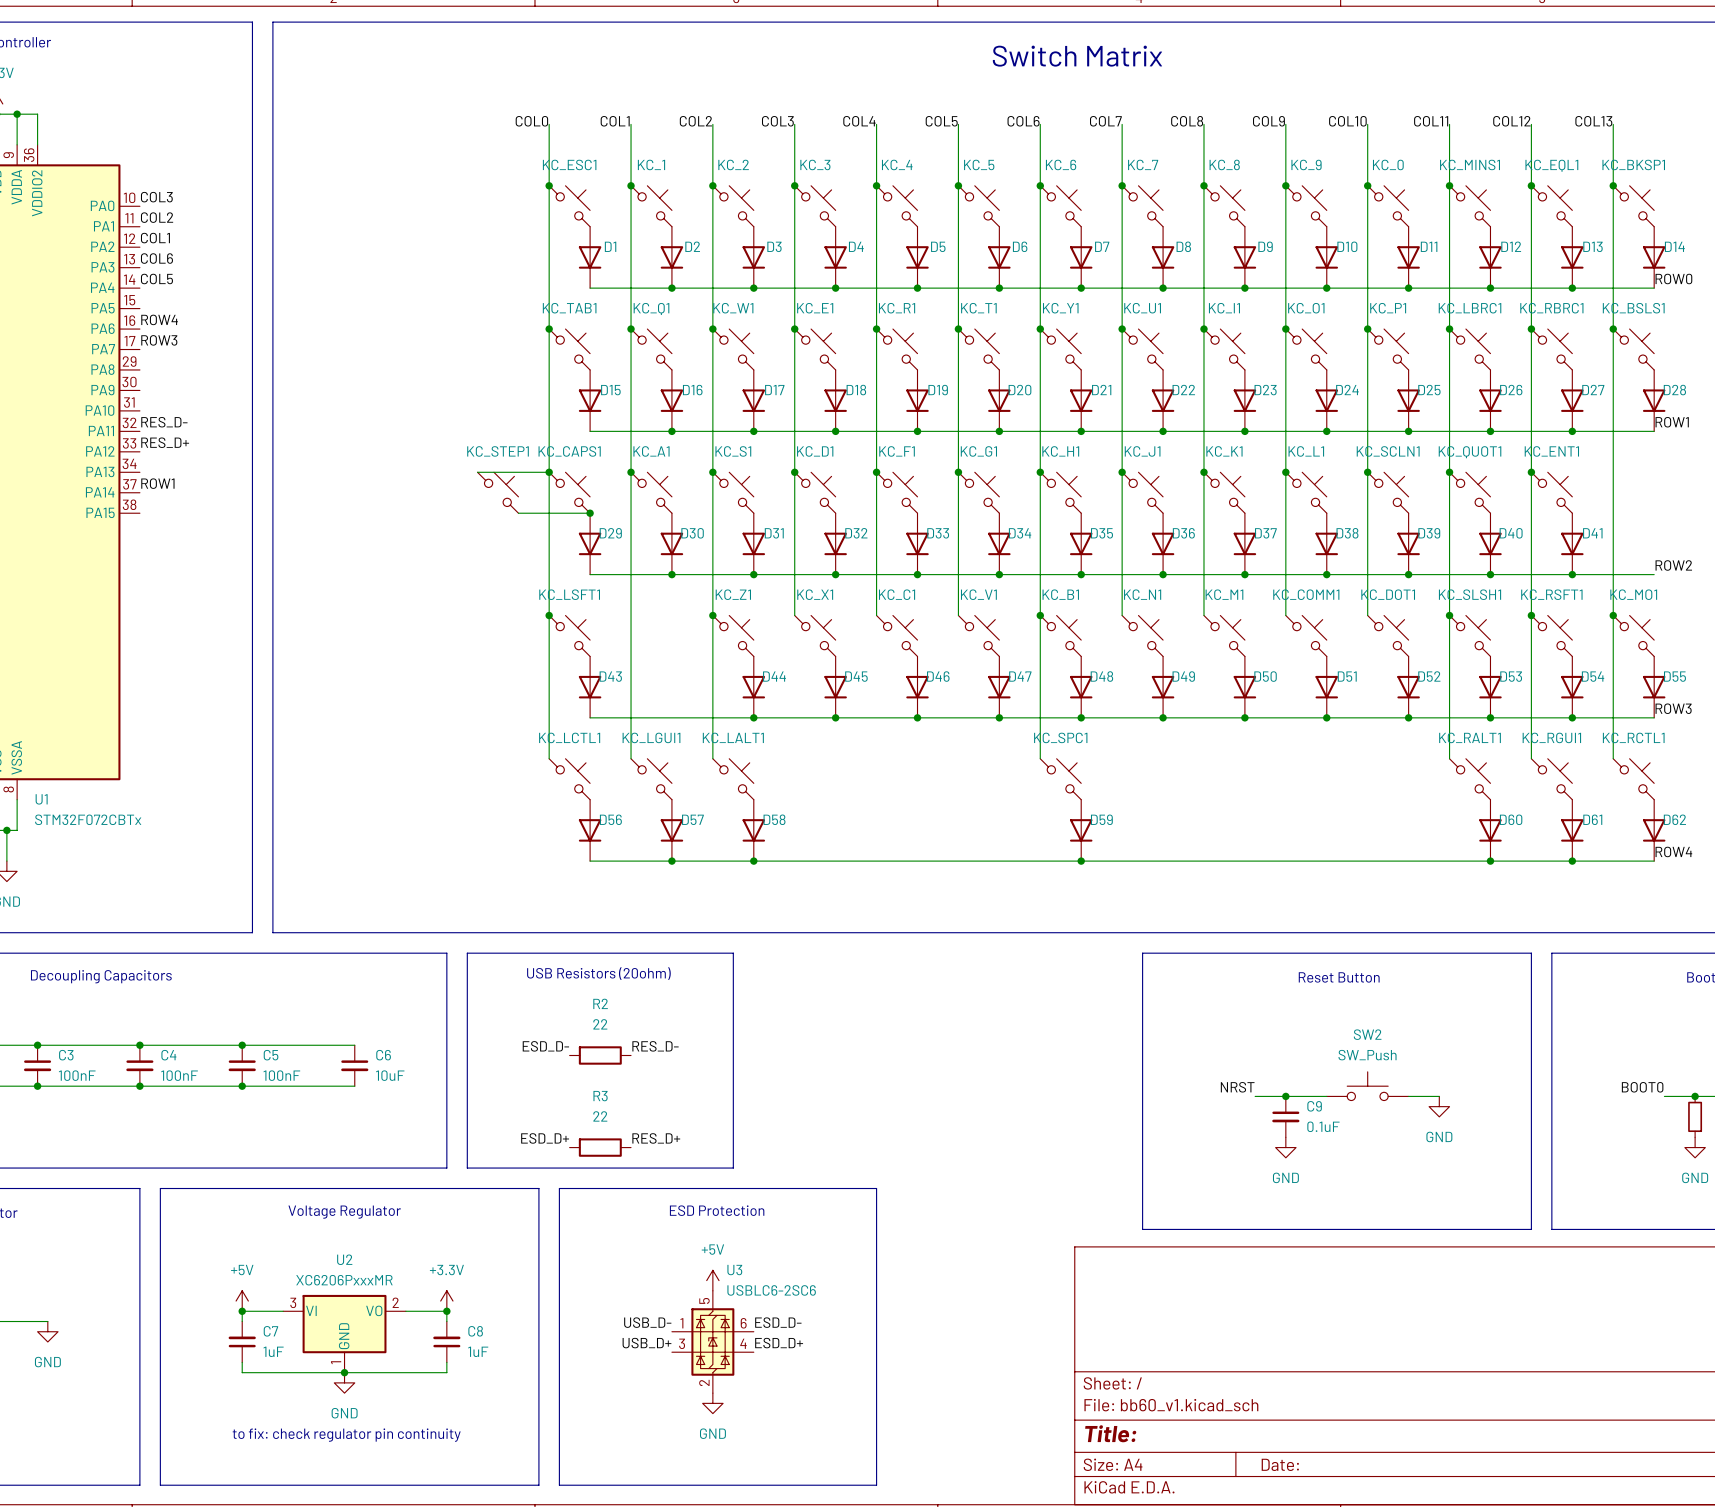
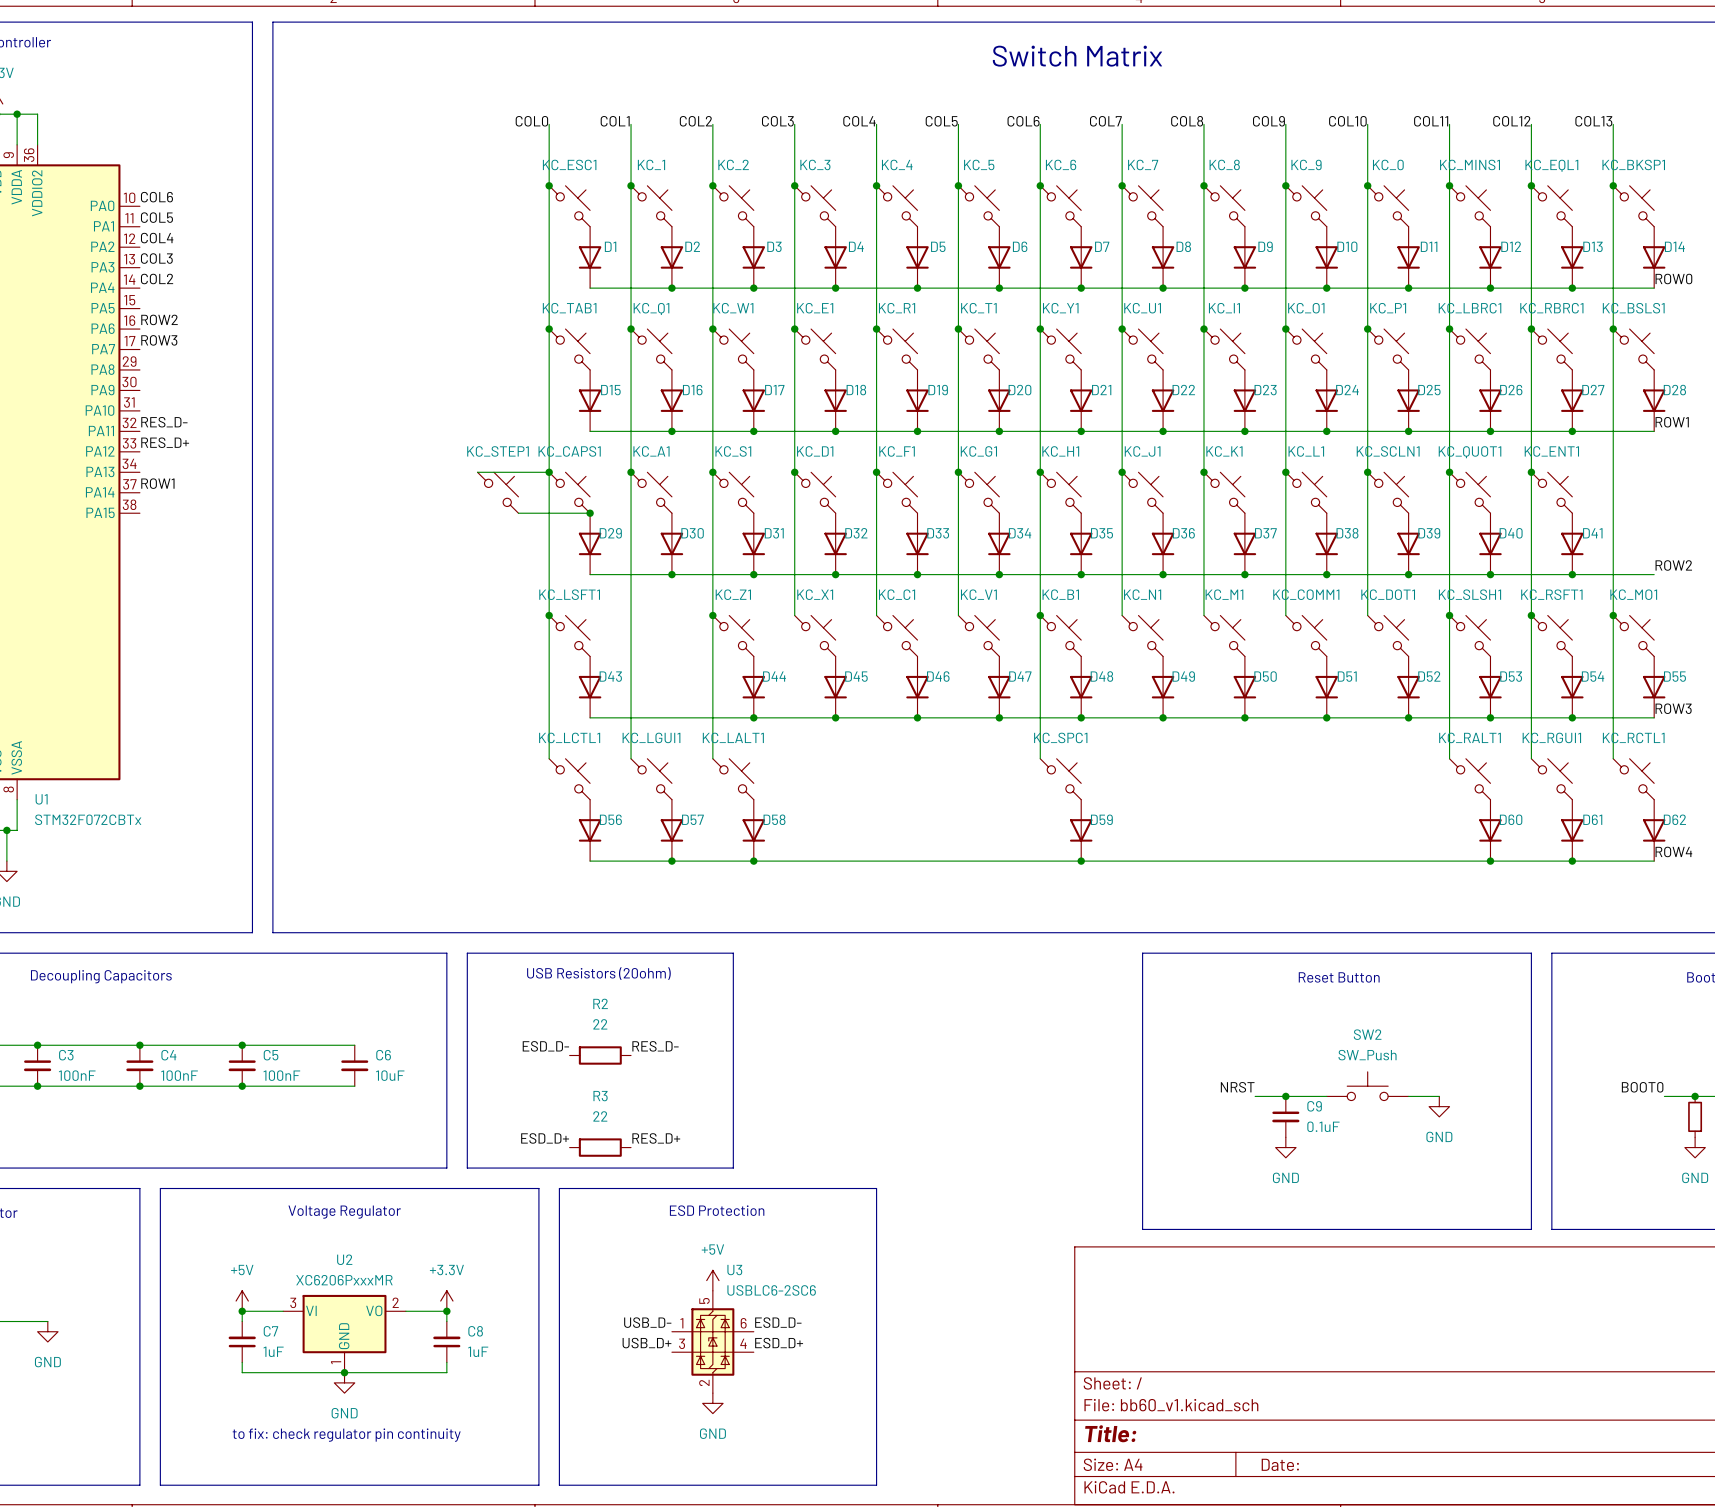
label: COL3 (156, 197) -> COL6 (156, 197)
label: COL2 (157, 217) -> COL5 (156, 217)
label: COL1 (155, 238) -> COL4 (157, 238)
label: COL6 (156, 258) -> COL3 (156, 258)
label: COL5 (156, 279) -> COL2 (157, 279)
label: ROW4 (159, 319) -> ROW2 (159, 319)

